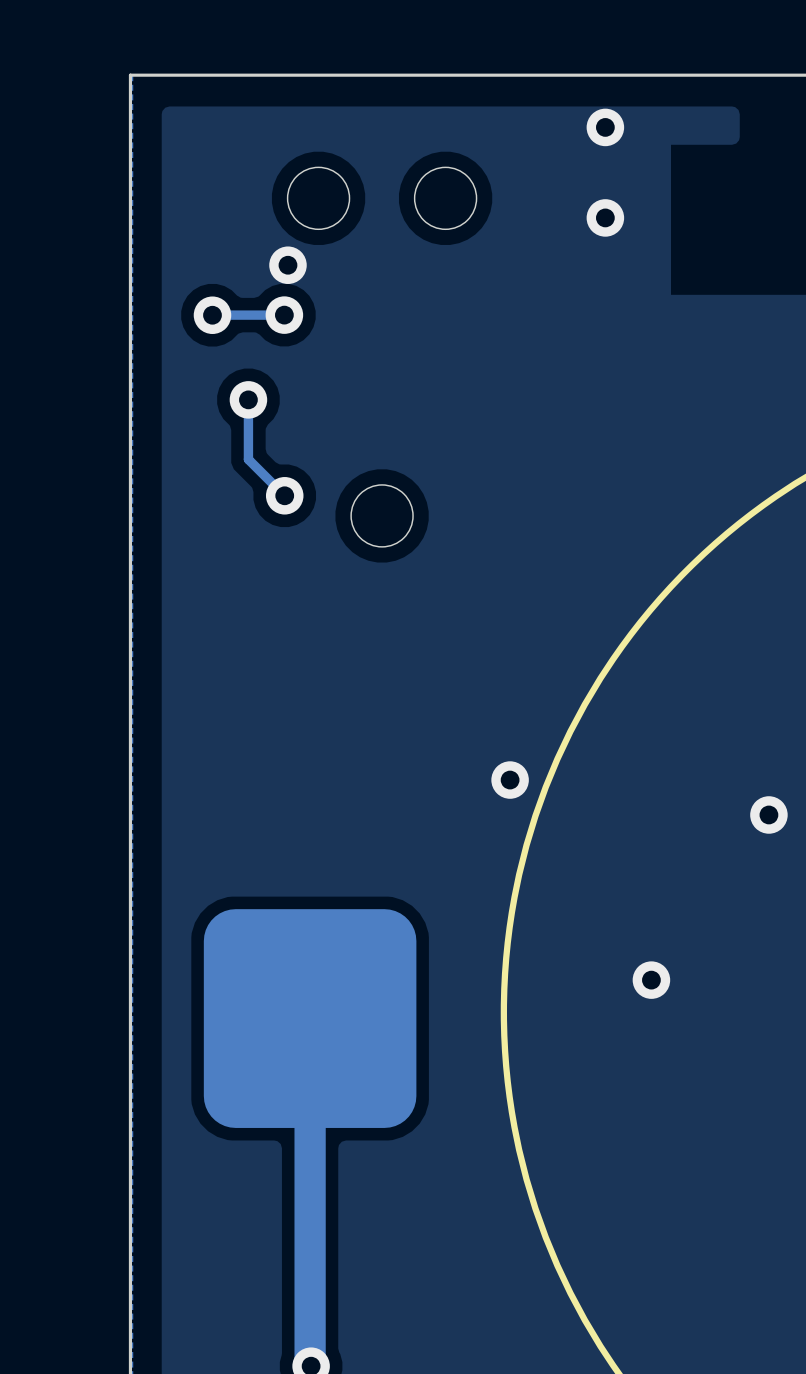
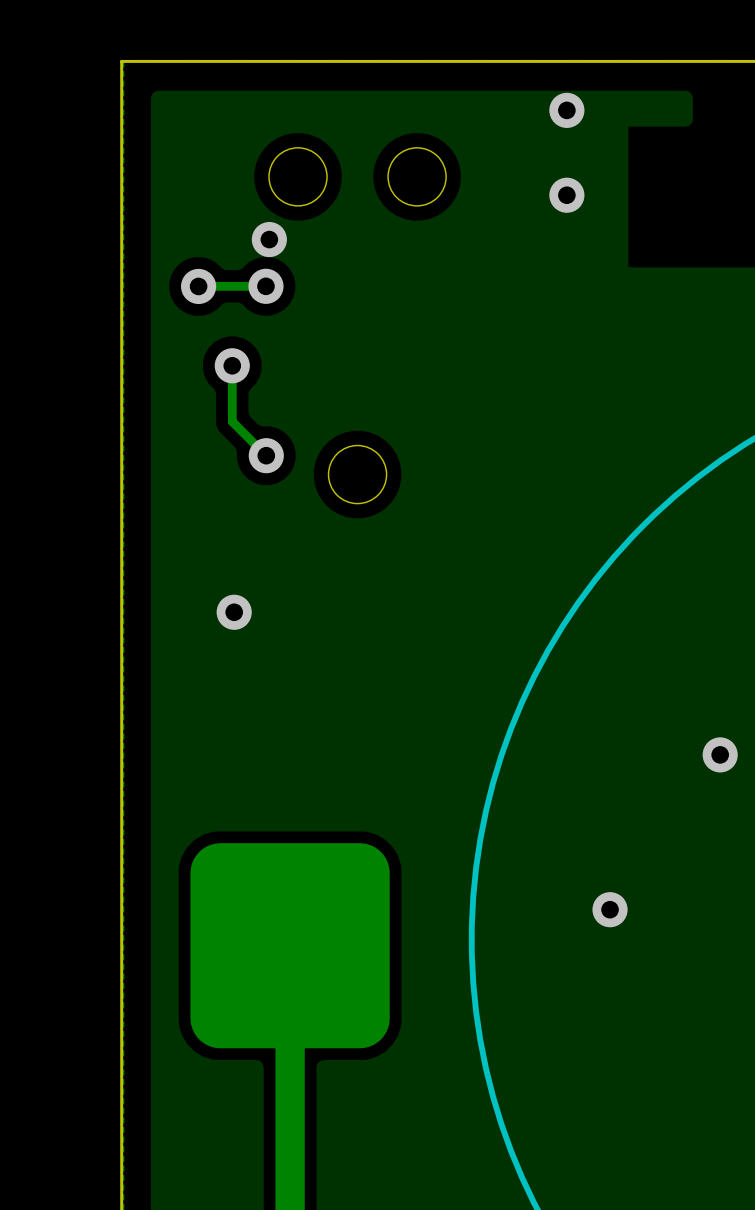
via position: (510, 780) -> (234, 612)

